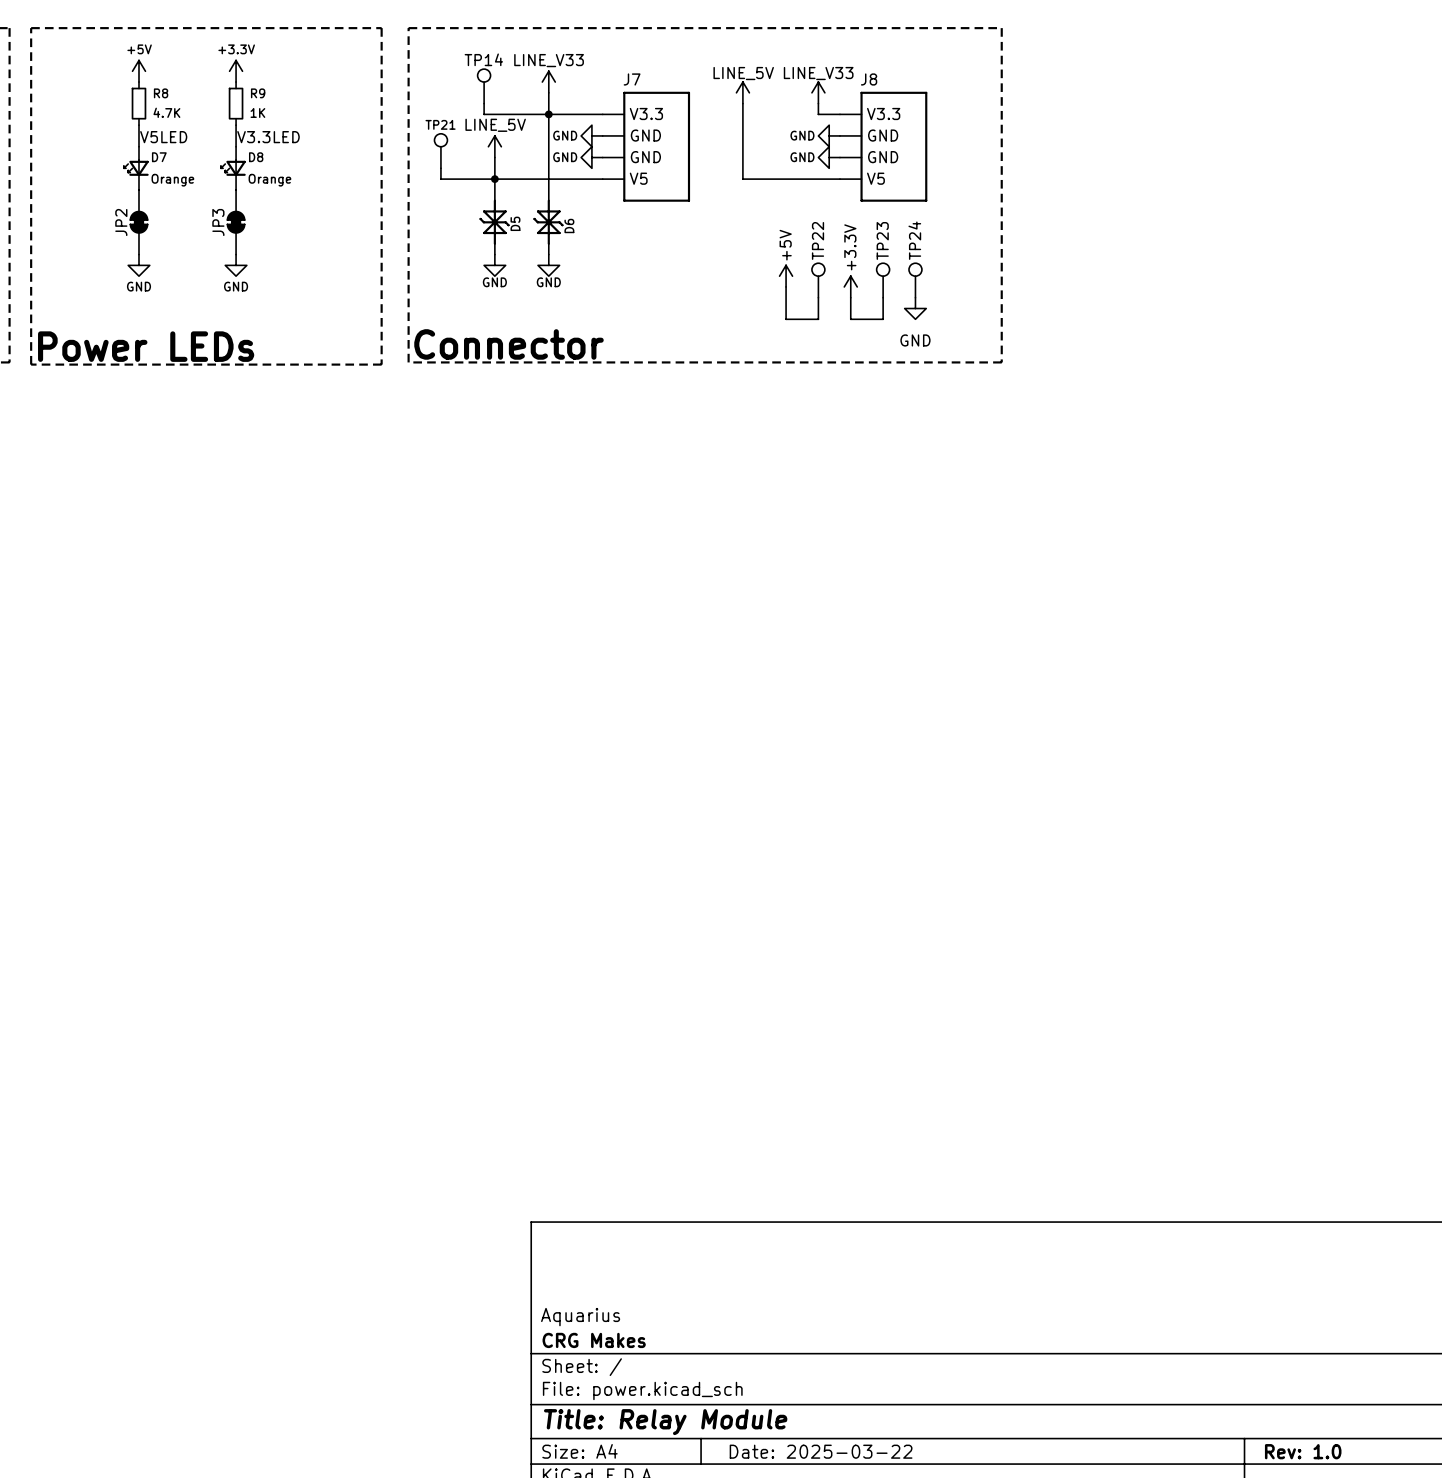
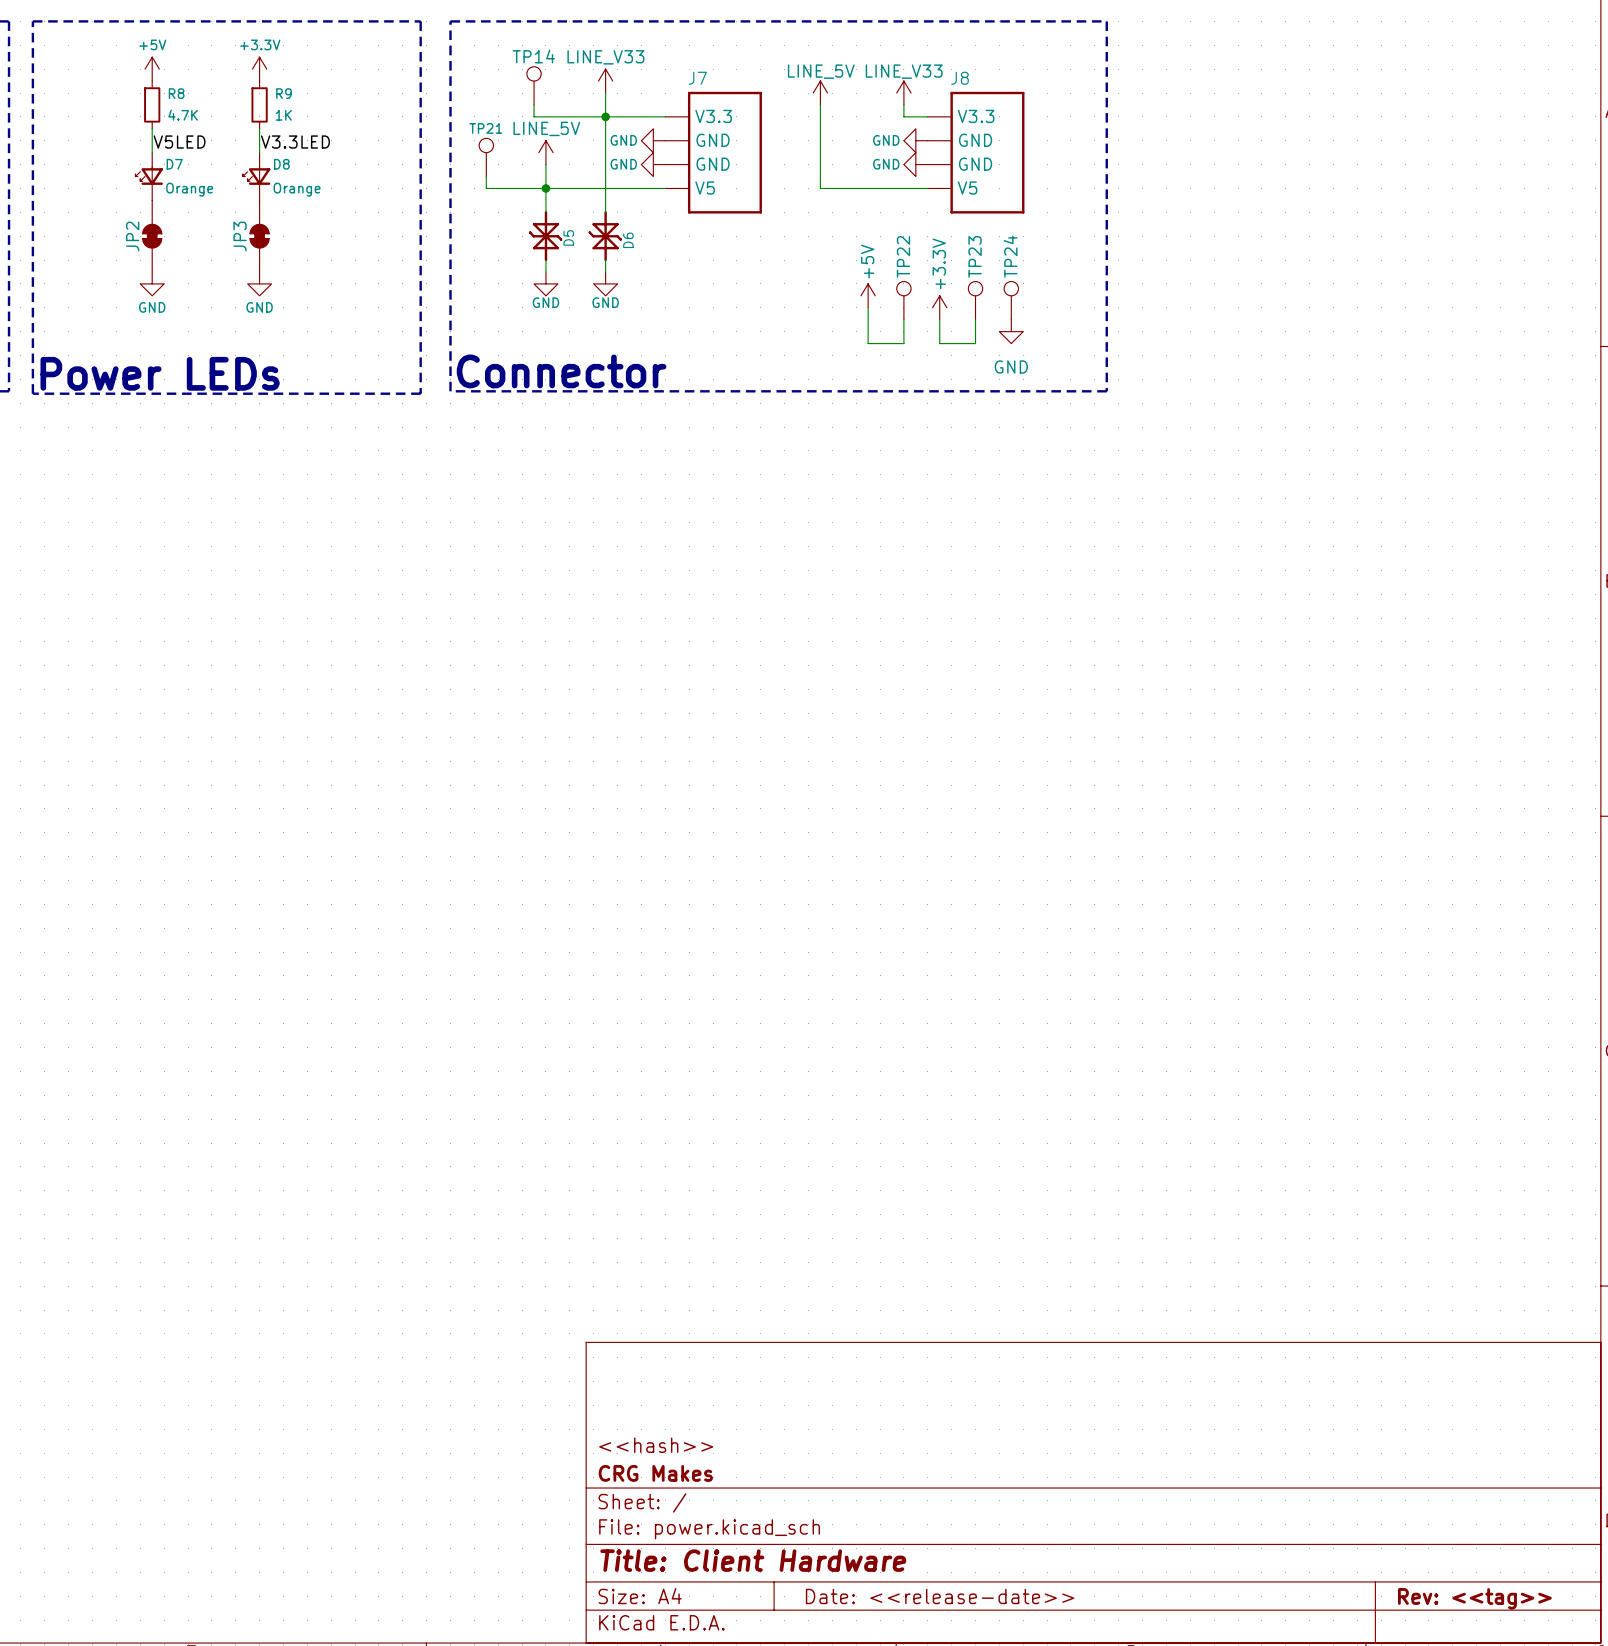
title block: Aquarius (580, 1317) -> <<hash>> (656, 1445)
title block: Title: Relay Module (665, 1422) -> Title: Client Hardware (753, 1560)
title block: Date: 2025-03-22 (821, 1451) -> Date: <<release-date>> (940, 1596)
title block: Rev: 1.0 (1303, 1451) -> Rev: <<tag>> (1474, 1598)

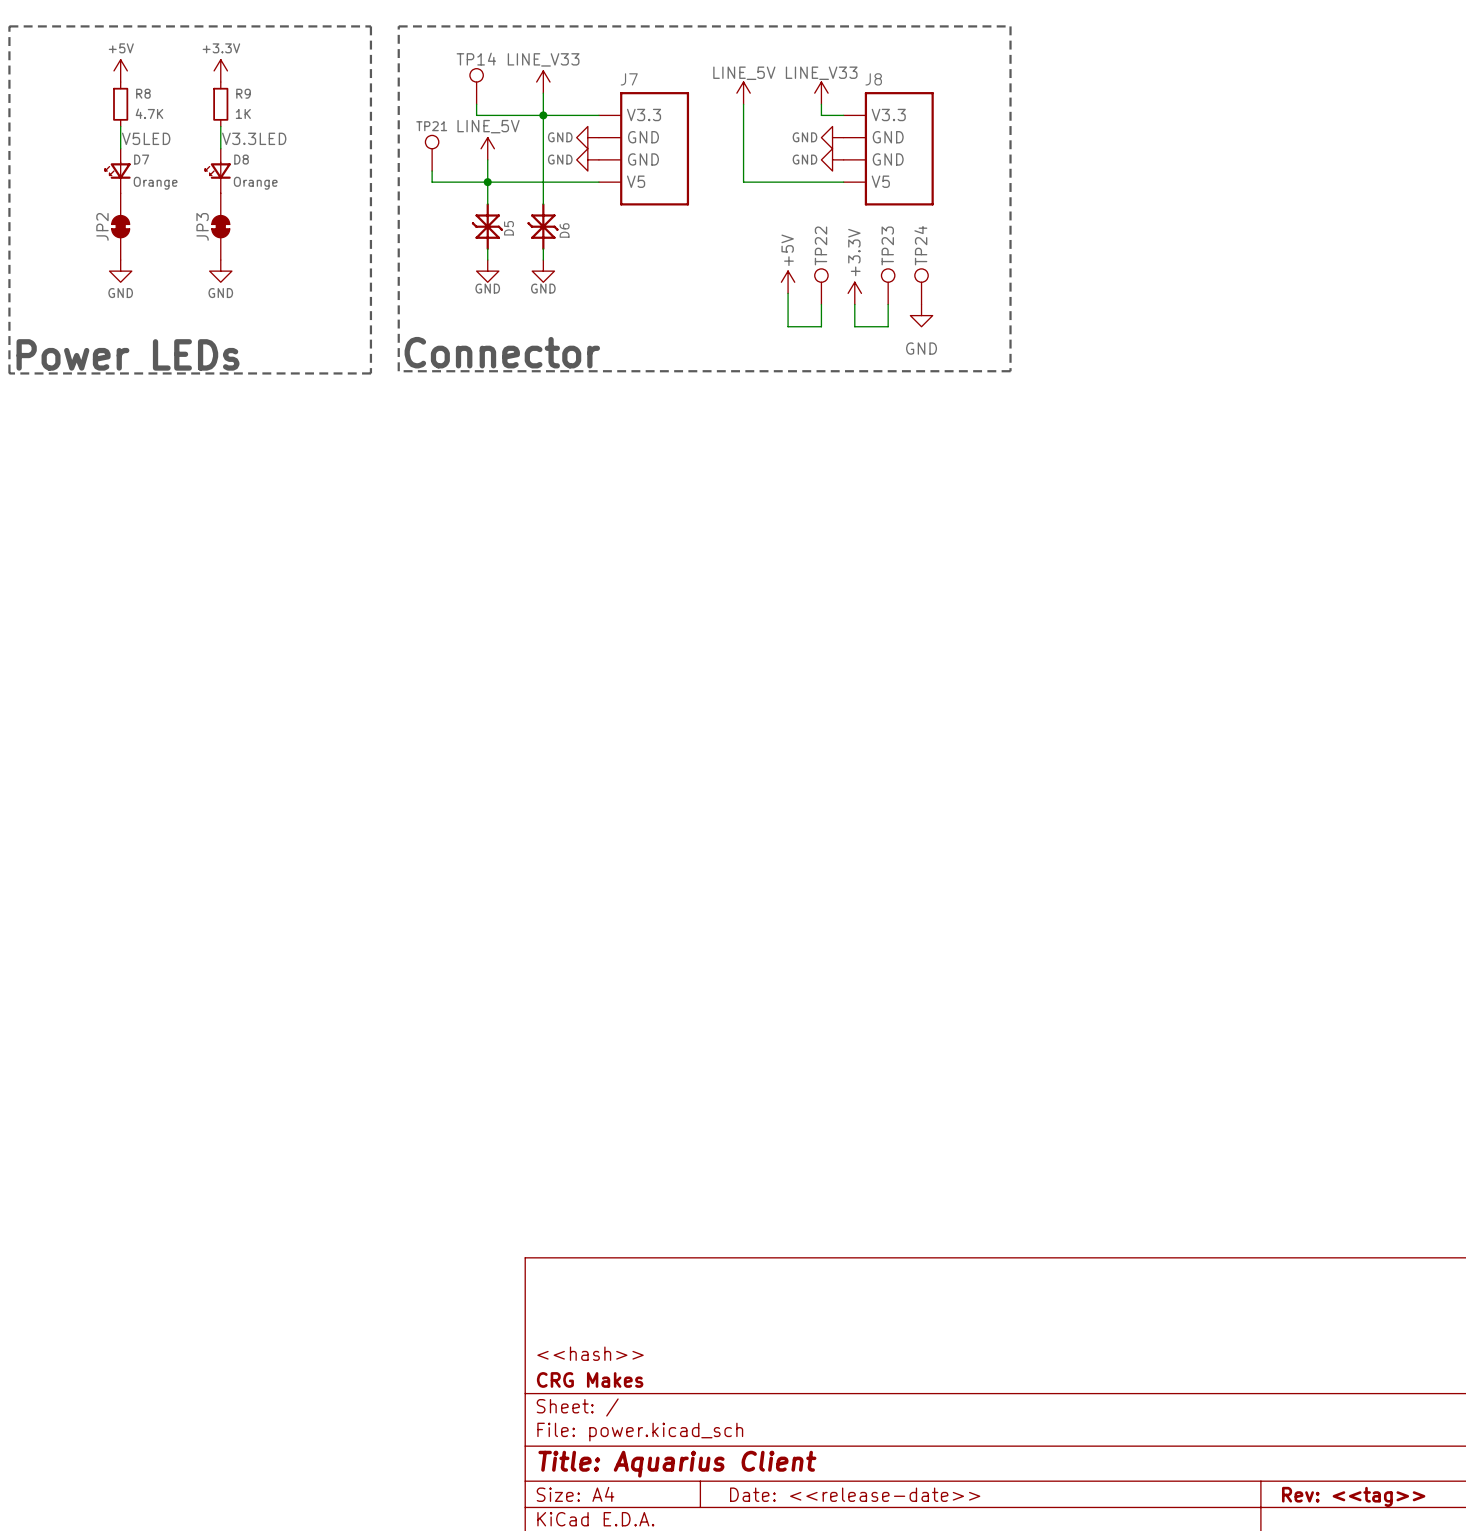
title block: Title: Client Hardware (753, 1560) -> Title: Aquarius Client (677, 1464)

